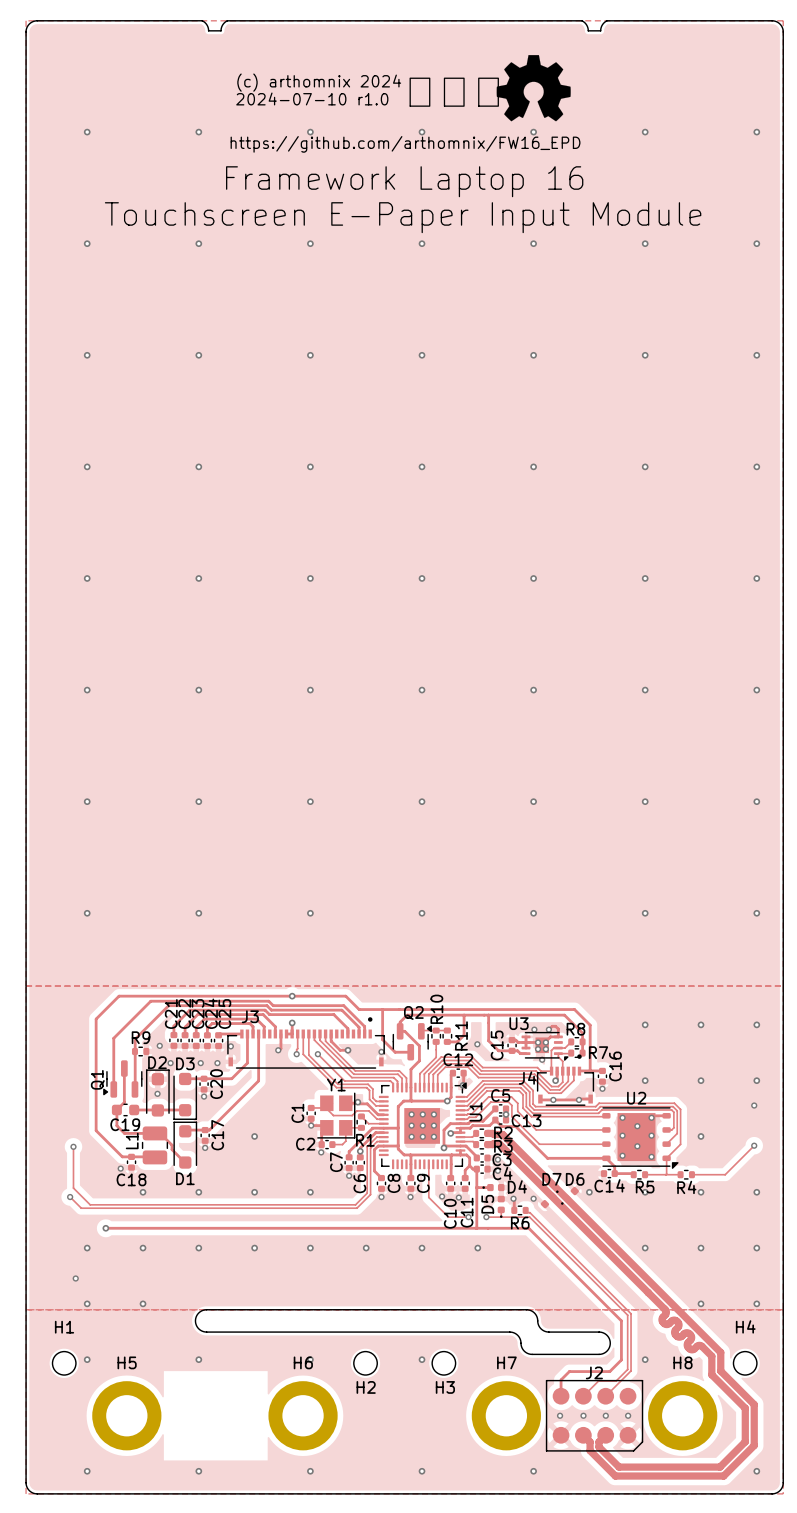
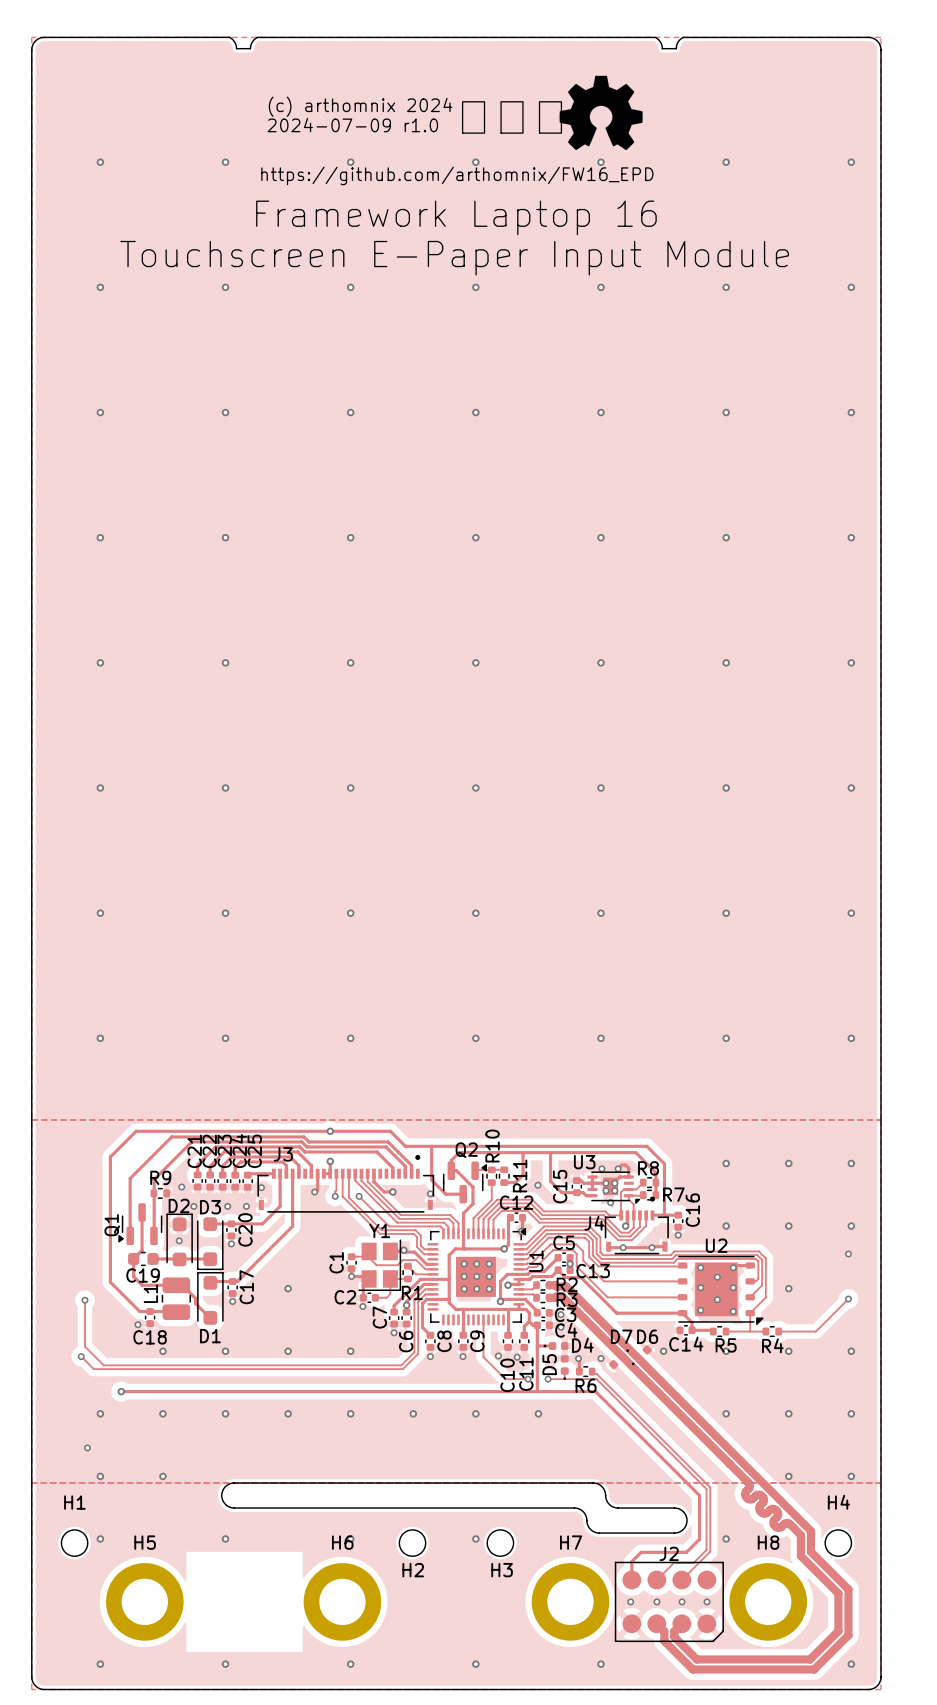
text: 2024-07-10 r1.0 (312, 98) -> 2024-07-09 r1.0 (352, 125)

